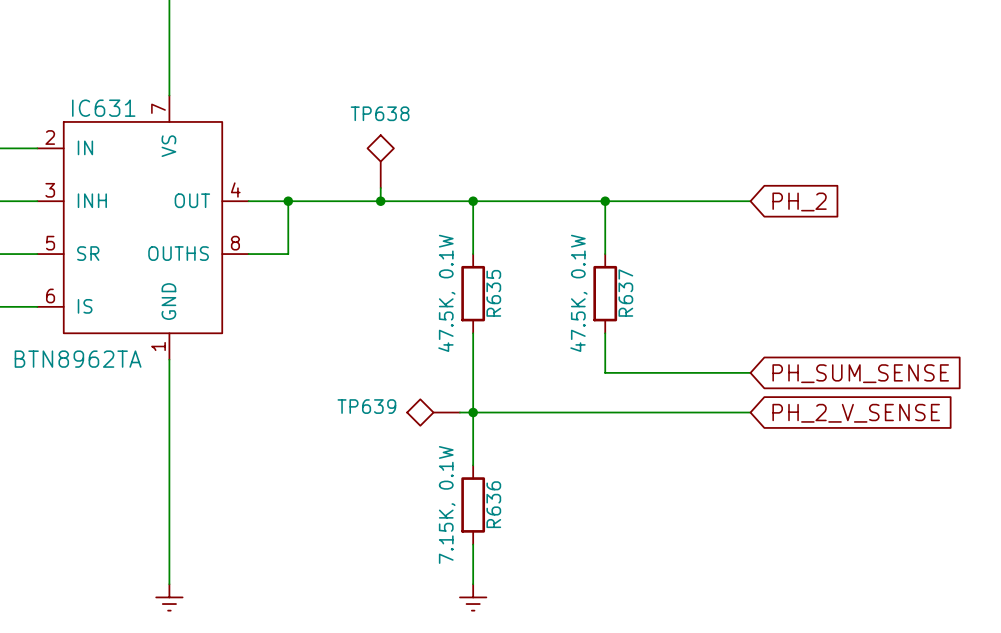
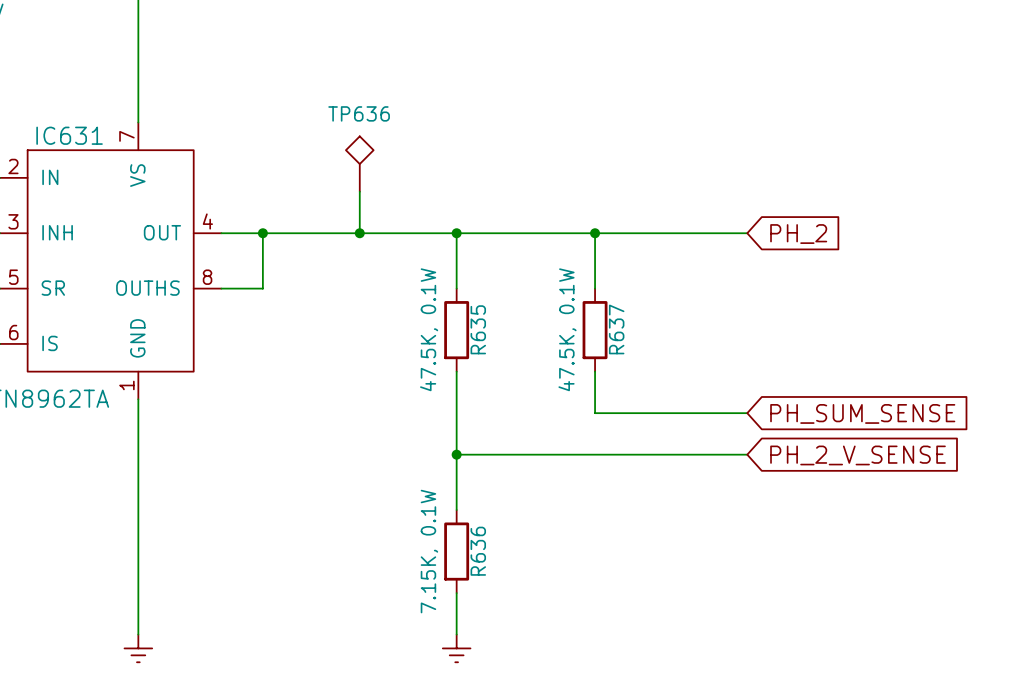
TP636: none -> (359, 164)
TP638: (380, 161) -> none
TP639: (433, 412) -> none
wire: (459, 412) (473, 412) -> none

